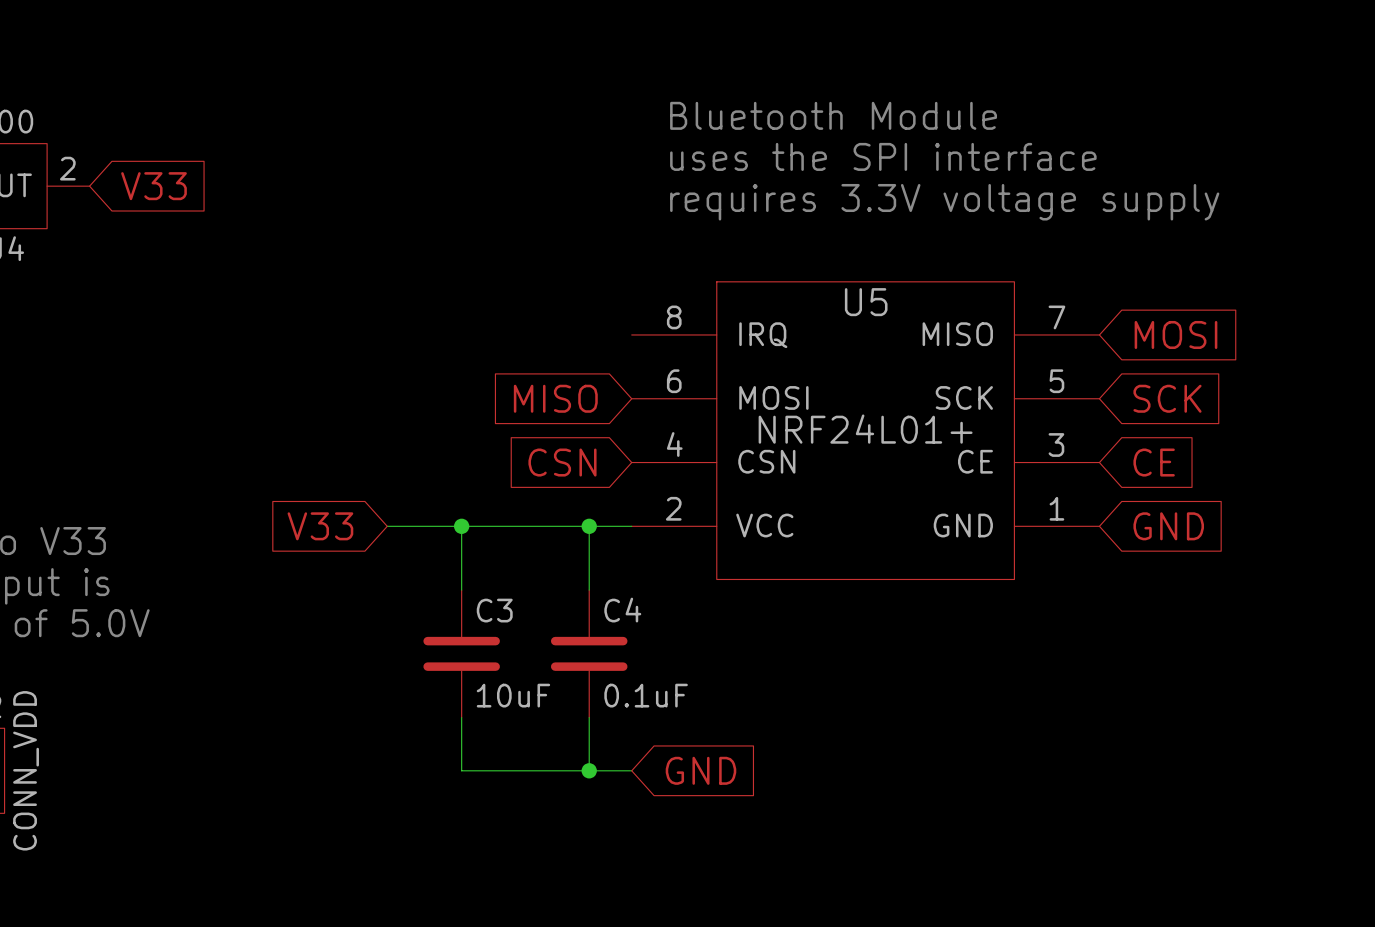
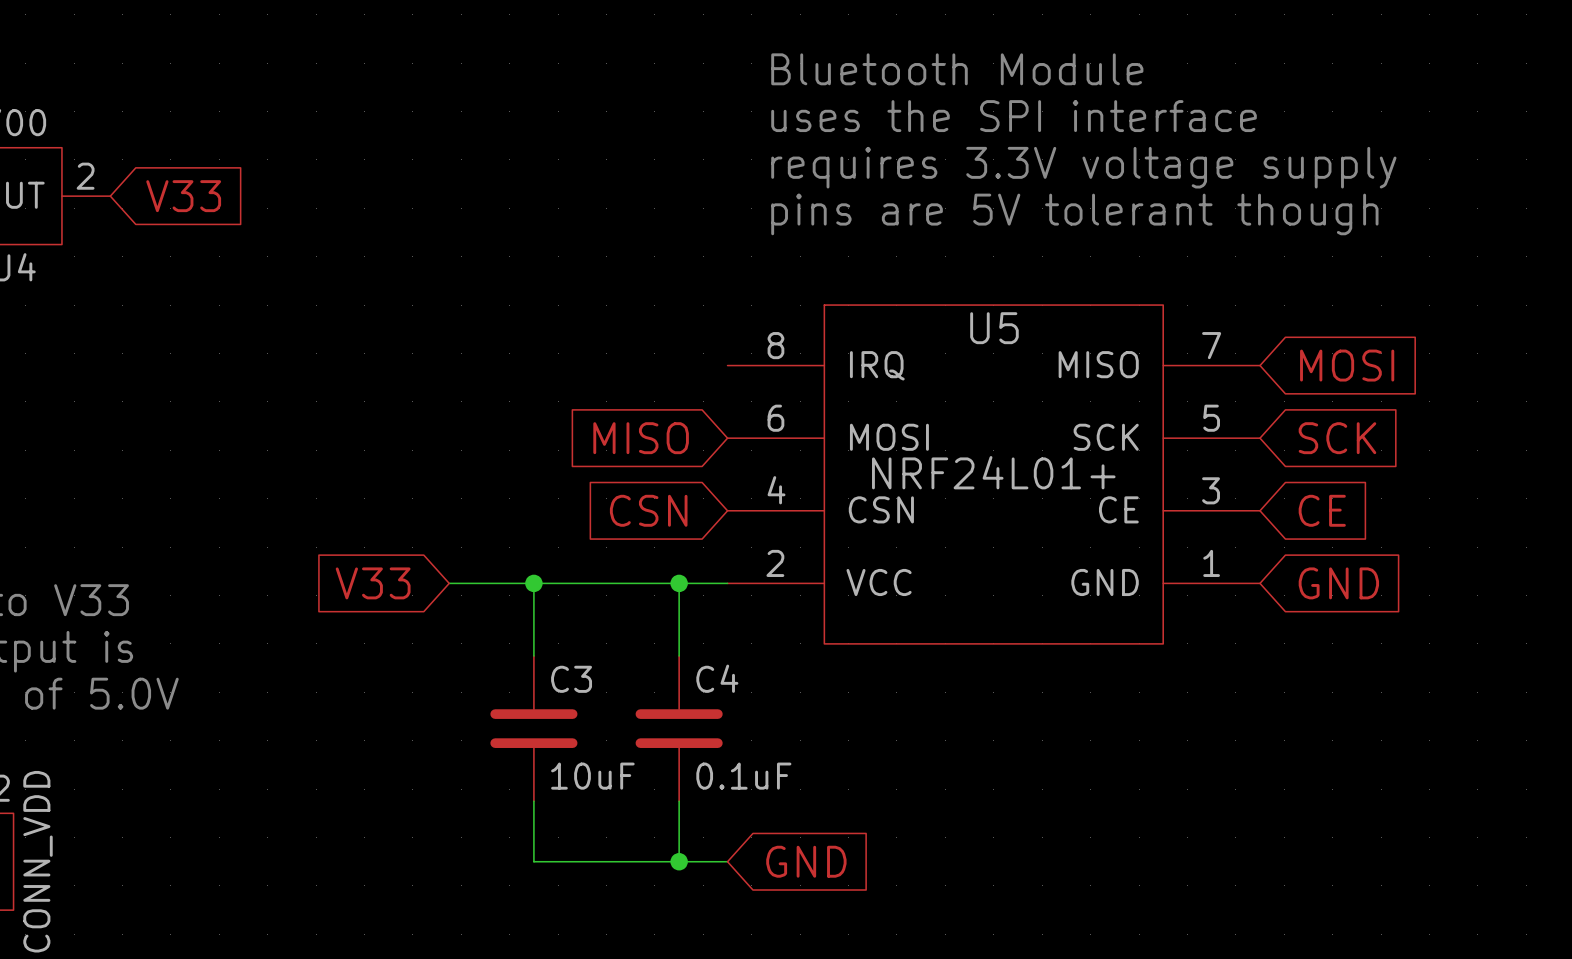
text: none -> Bluetooth Module (957, 69)
text: Bluetooth Module (833, 115) -> uses the SPI interface (1014, 116)
text: uses the SPI interface (883, 156) -> requires 3.3V voltage supply (1083, 167)
text: requires 3.3V voltage supply (944, 202) -> pins are 5V tolerant though (1074, 214)

